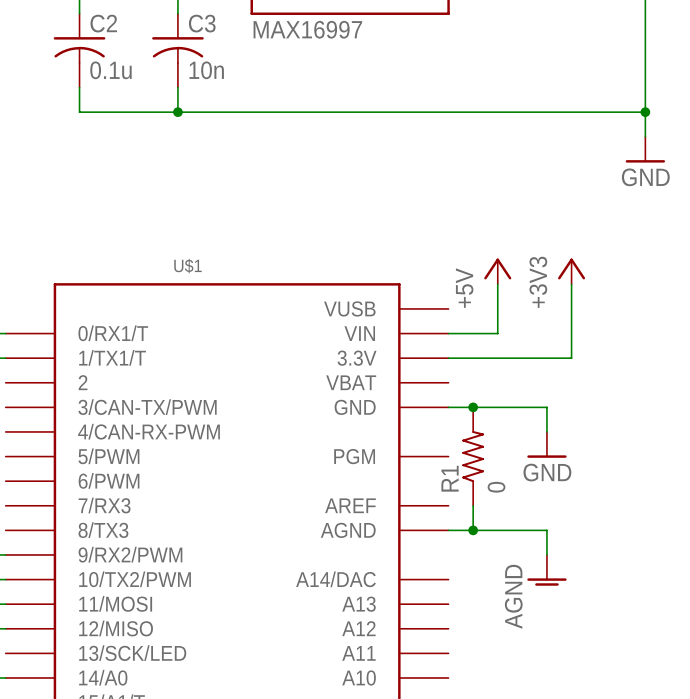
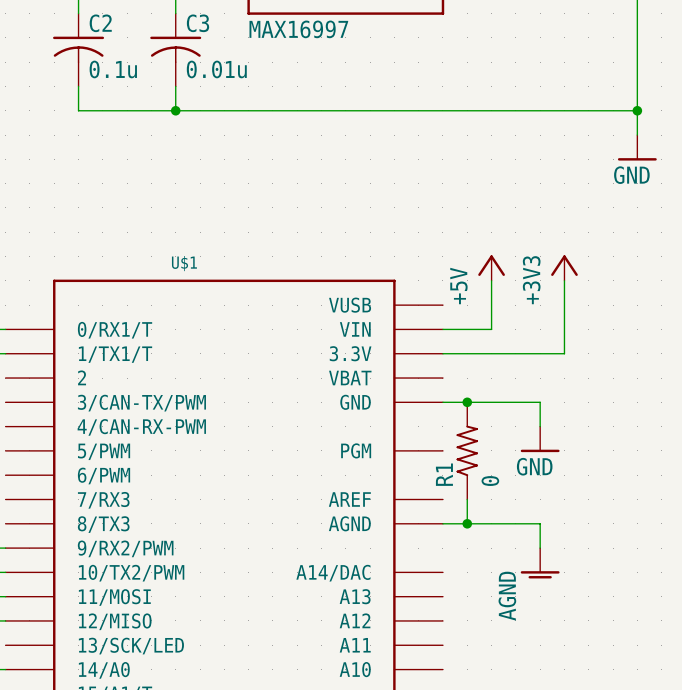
C3 value: 10n (206, 70) -> 0.01u (216, 69)

